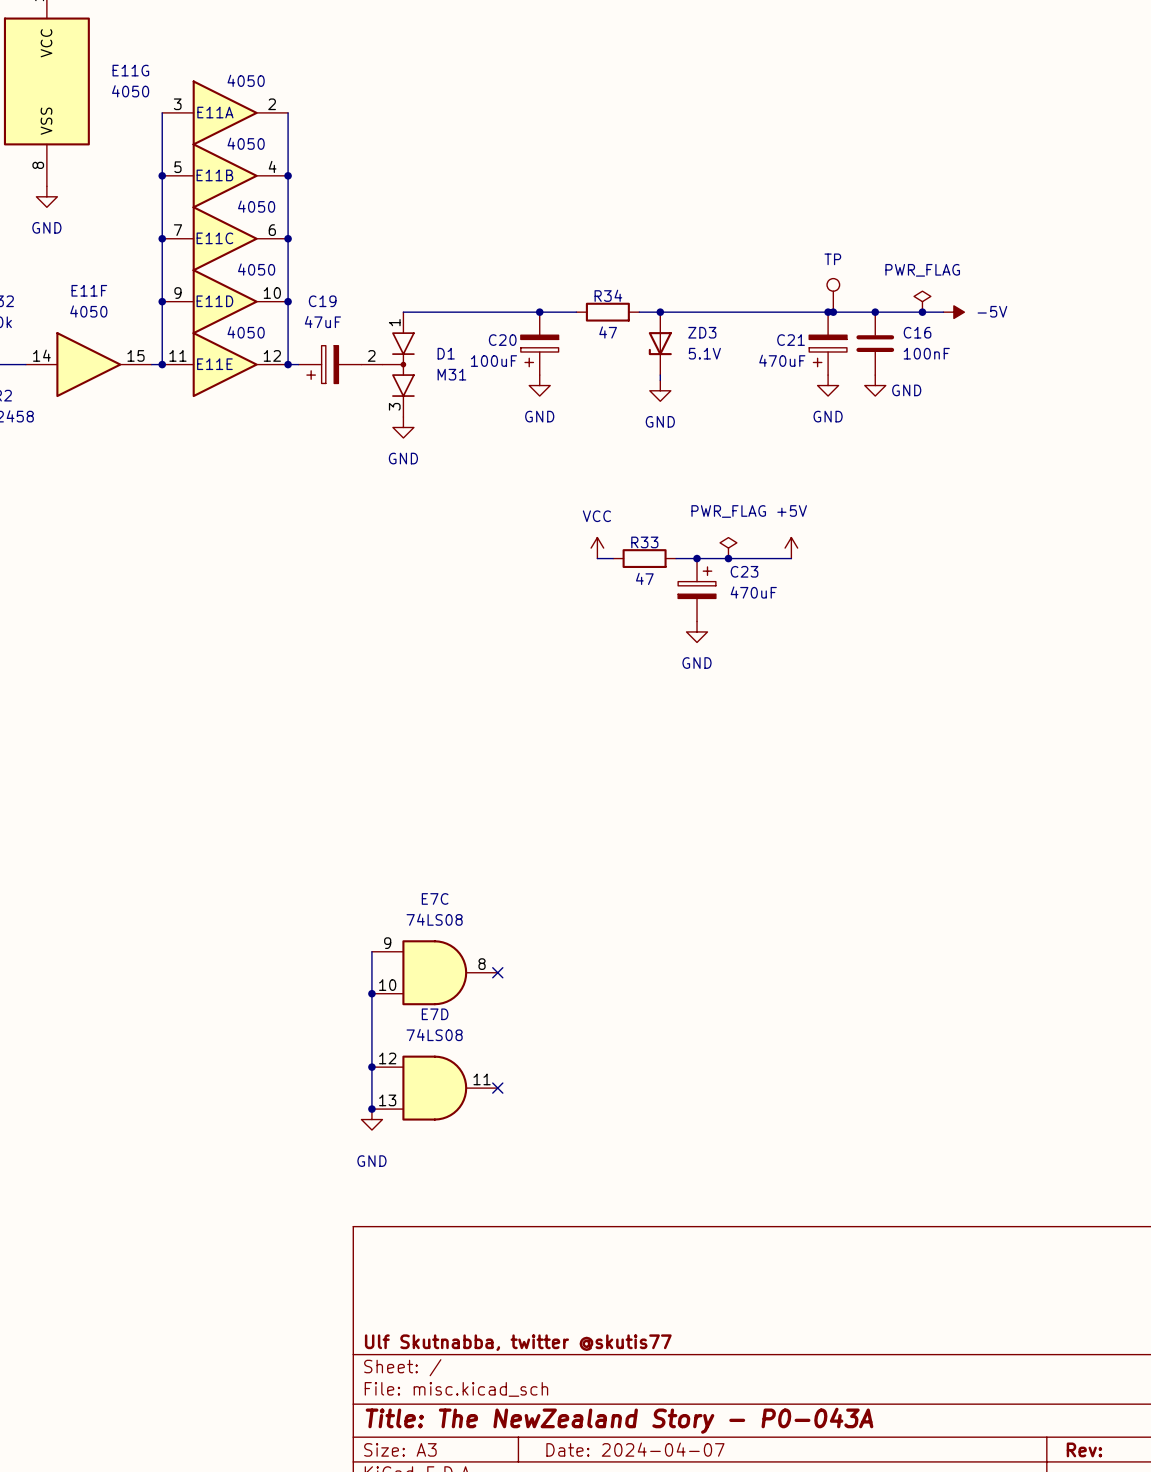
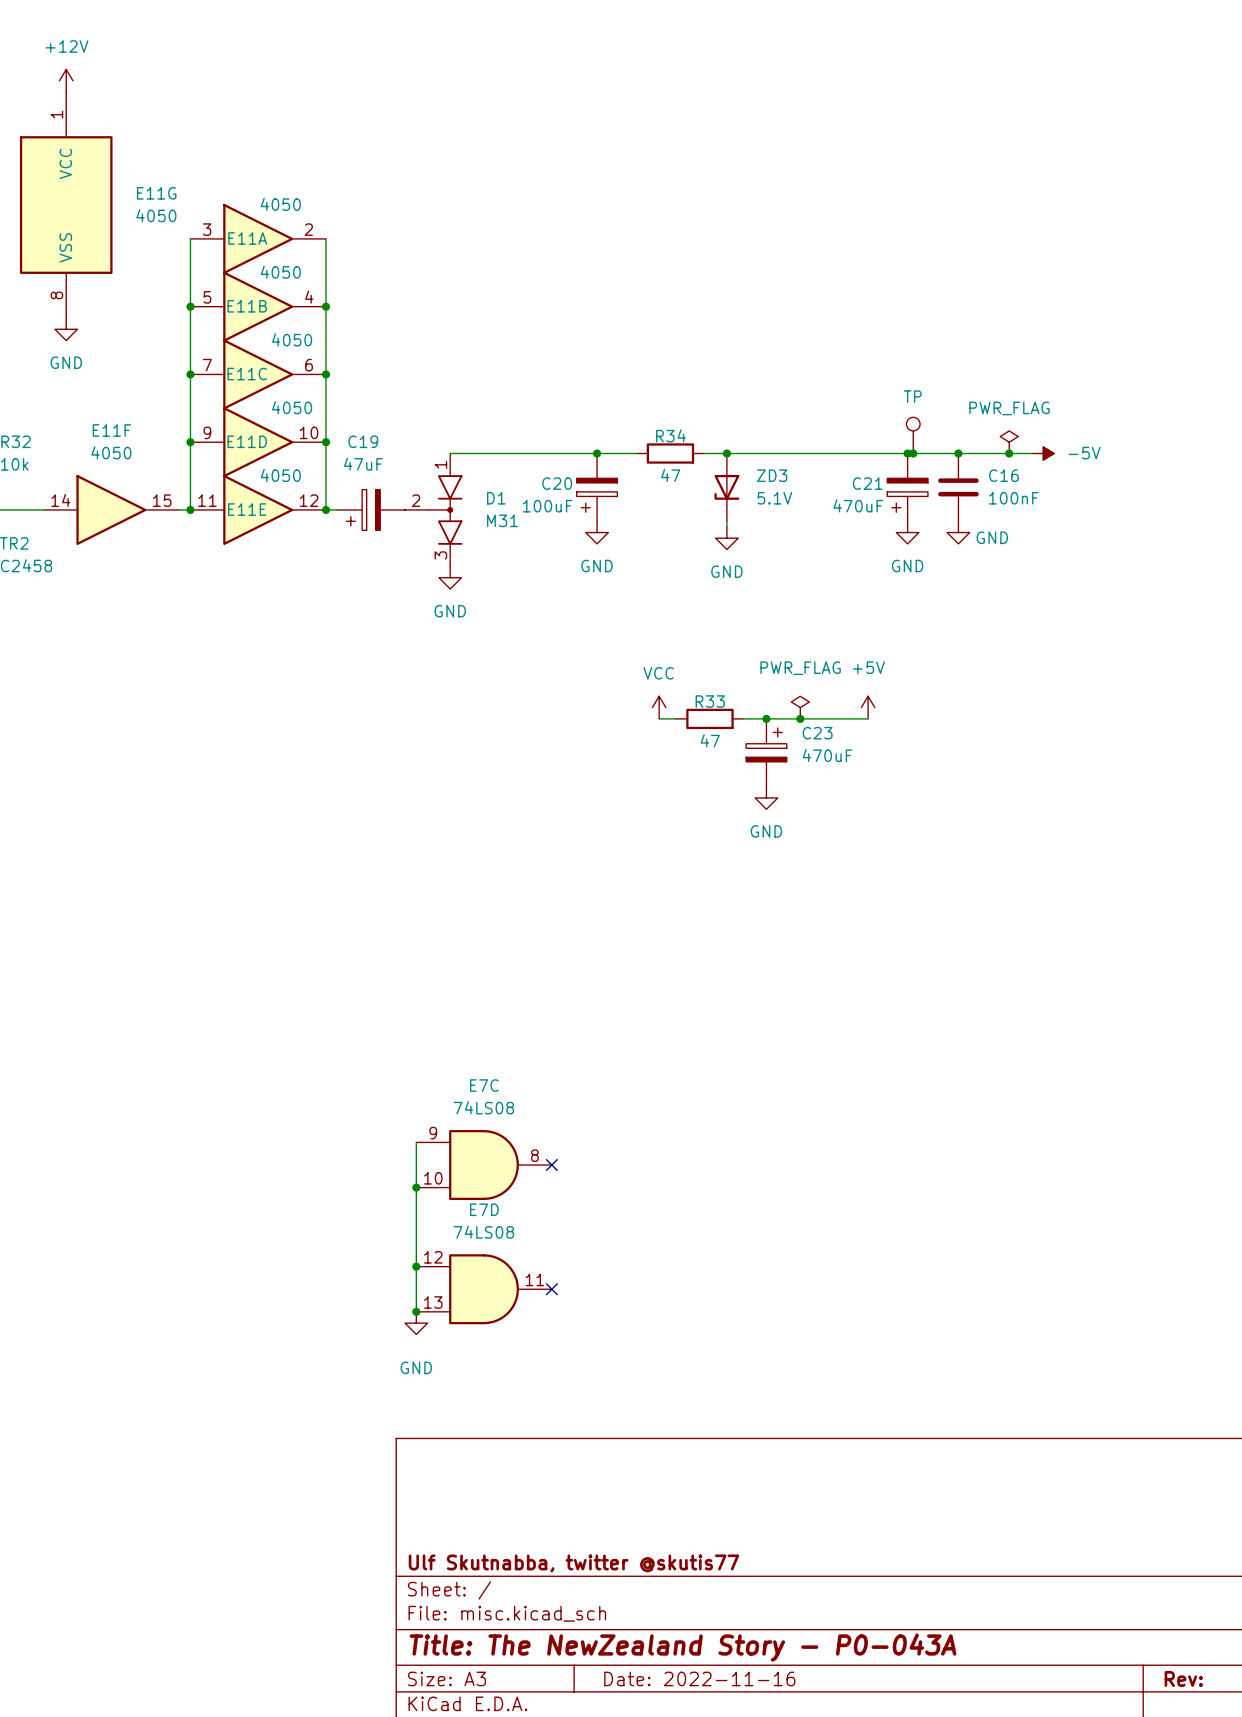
title block: Date: 2024-04-07 (635, 1449) -> Date: 2022-11-16 (699, 1678)

